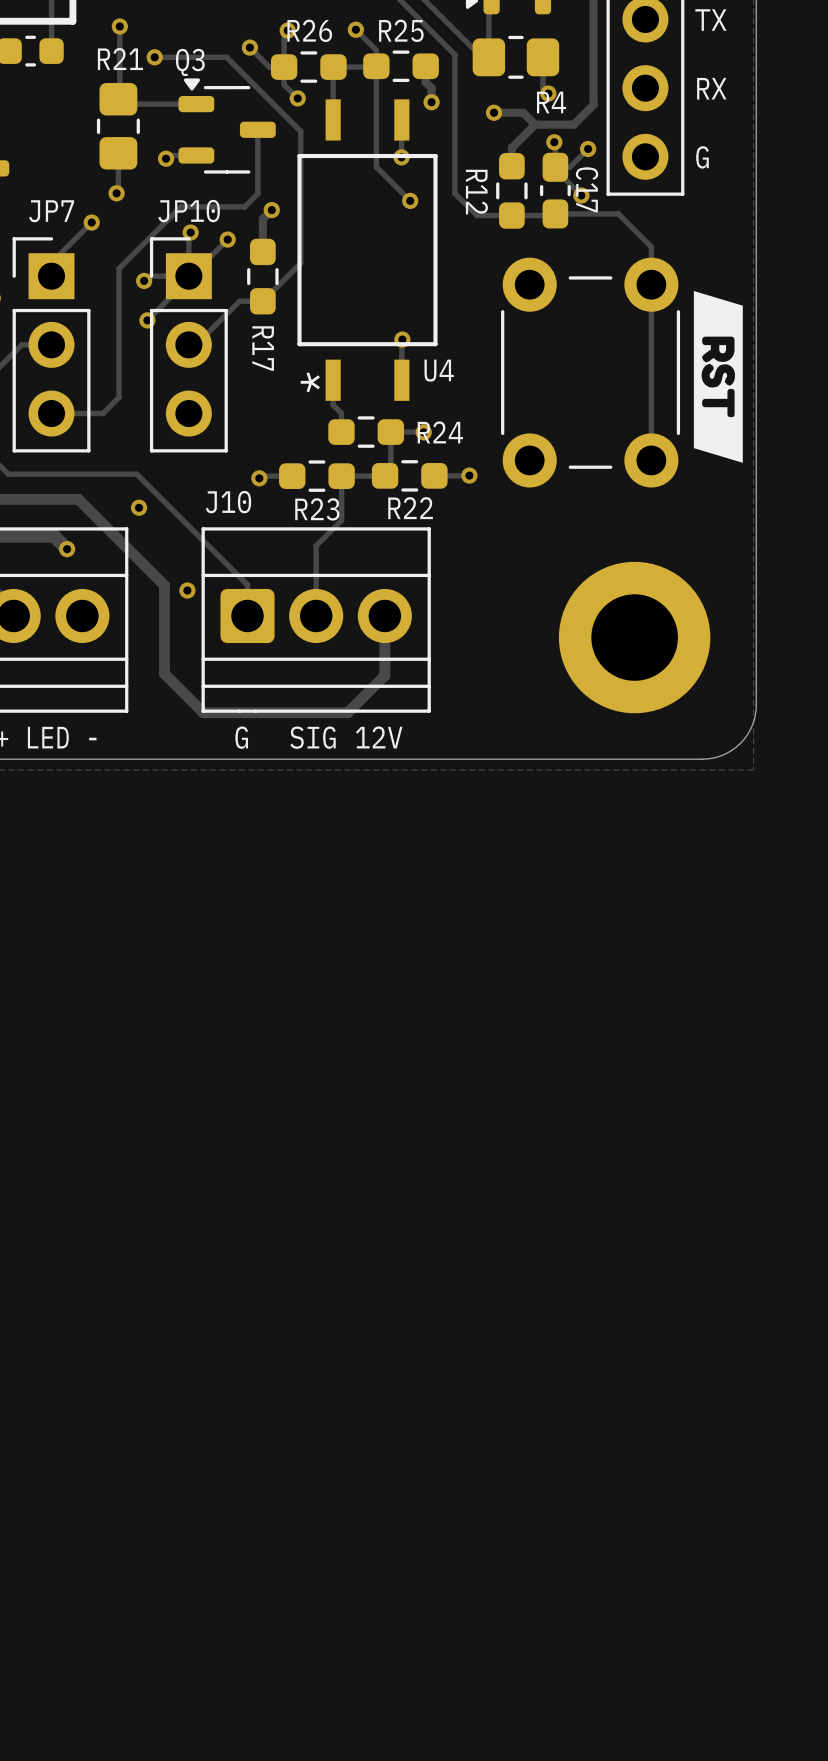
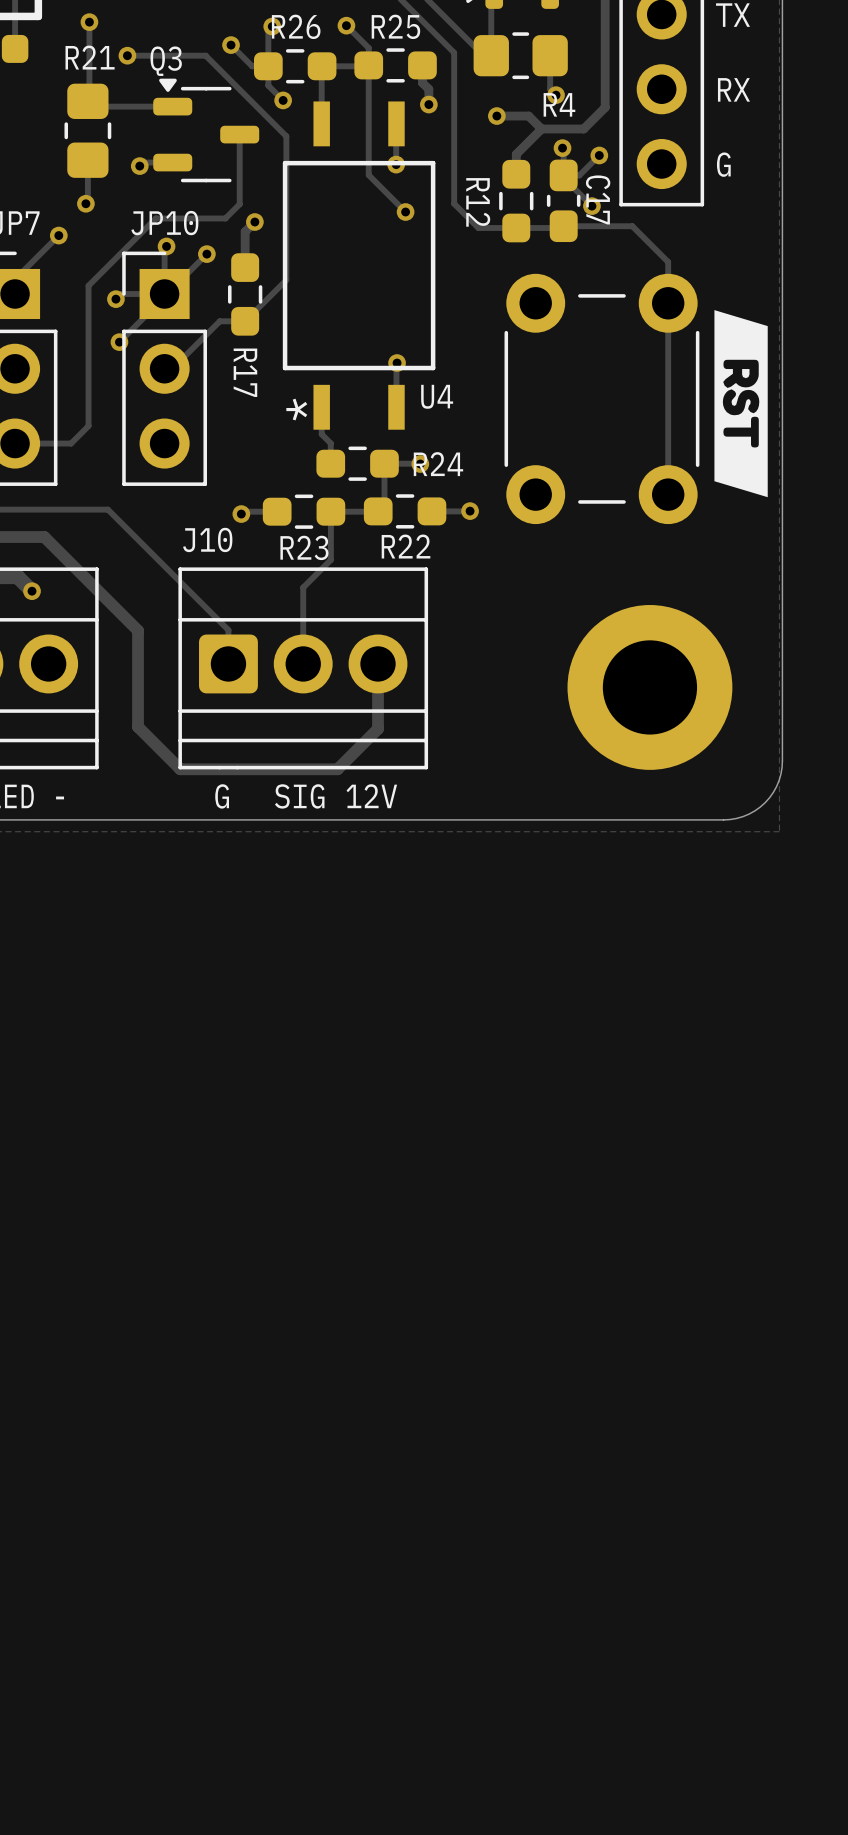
via: (139, 507) -> none
via: (187, 590) -> none

